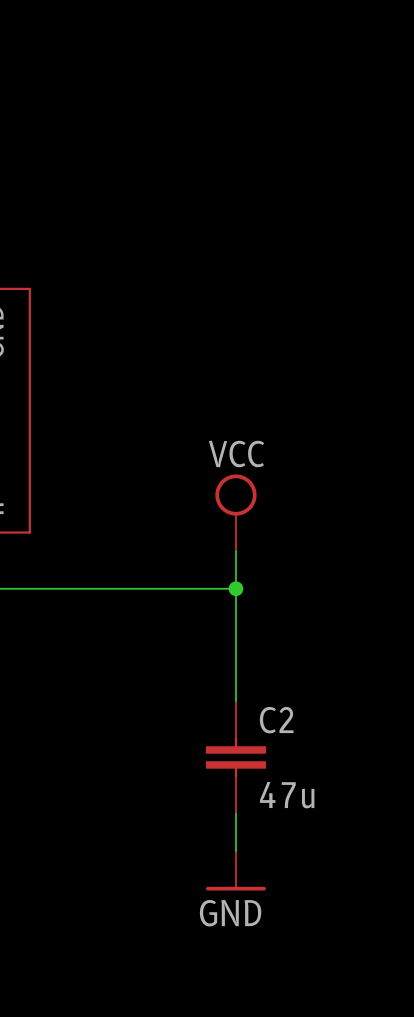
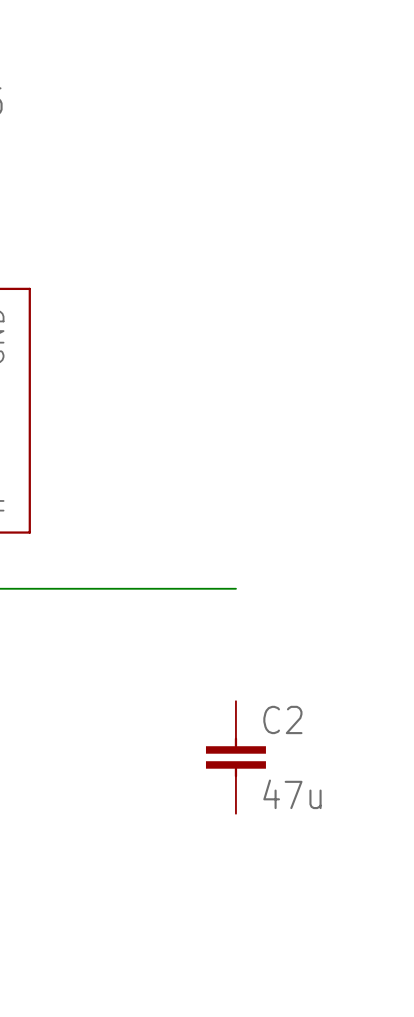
power symbol: VCC (235, 512) -> none
wire: (235, 551) (235, 701) -> none
junction: (235, 588) -> none
wire: (235, 813) (235, 851) -> none
power symbol: GND (235, 870) -> none

